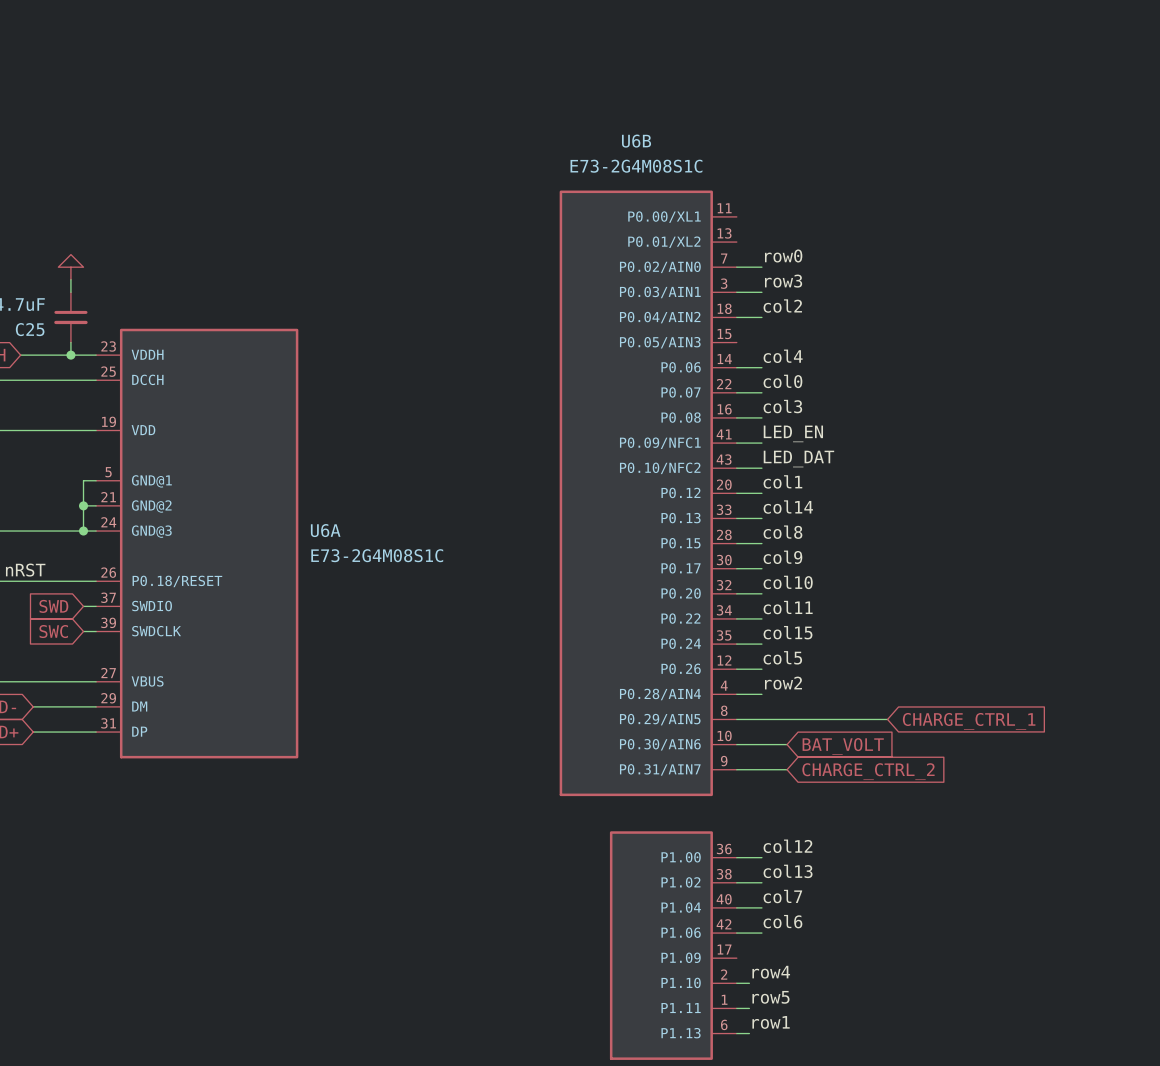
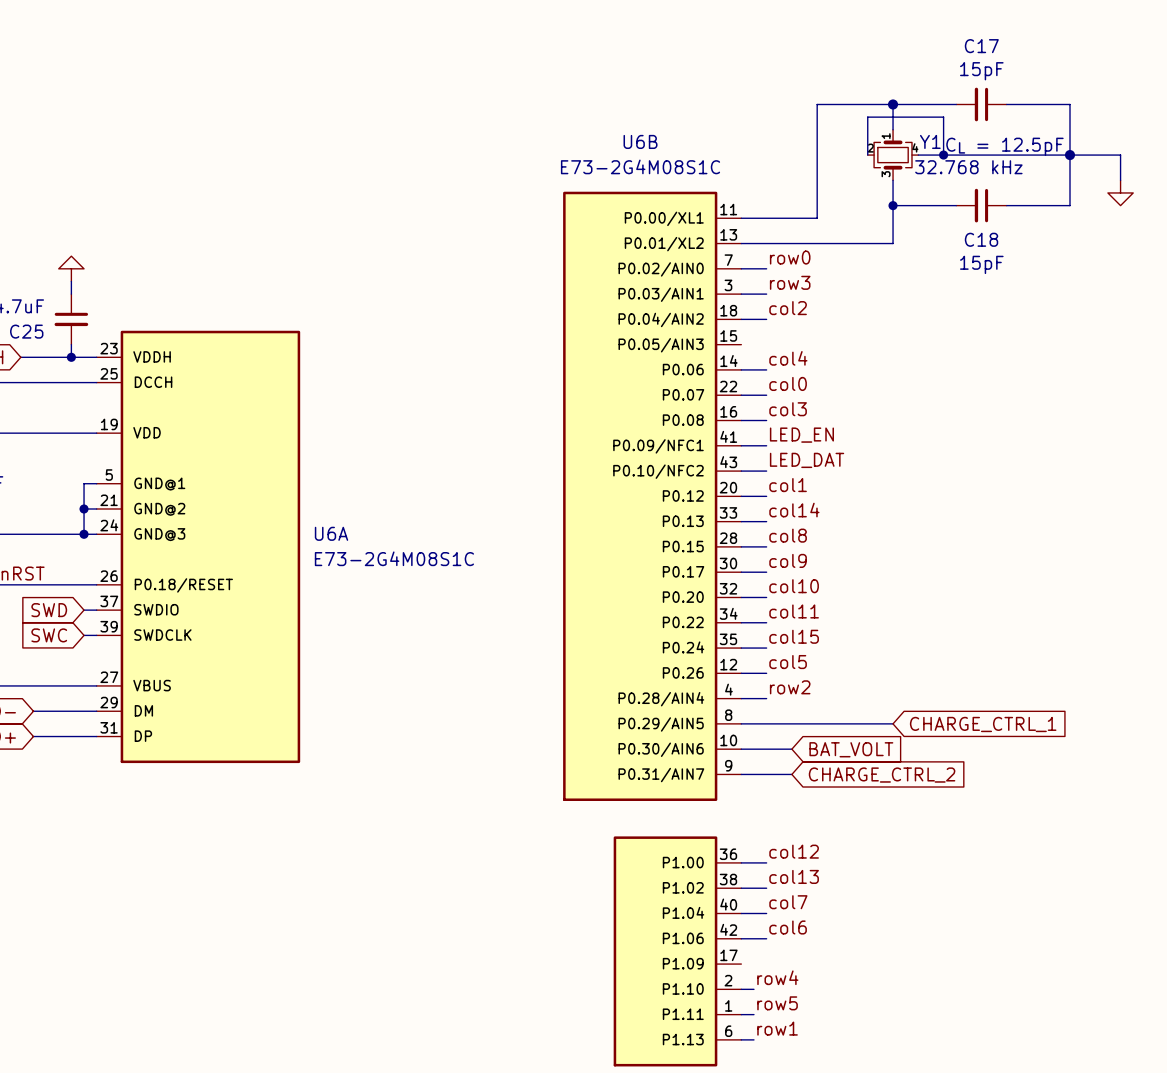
wire: none -> (893, 104) (893, 129)
junction: none -> (893, 104)
wire: none -> (956, 104) (817, 104) (817, 218) (741, 218)
C17: none -> 15pF (981, 104)
wire: none -> (1006, 104) (1070, 104) (1070, 205) (1006, 205)
text: none -> CL = 12.5pF (1004, 146)
wire: none -> (867, 155) (867, 117) (943, 117) (943, 155)
Y1: none -> 32.768 kHz (893, 155)
wire: none -> (918, 155) (1120, 155) (1120, 180)
junction: none -> (943, 155)
junction: none -> (1070, 155)
wire: none -> (893, 180) (893, 243) (741, 243)
power symbol: none -> (1120, 192)
wire: none -> (893, 205) (956, 205)
junction: none -> (893, 205)
C18: none -> 15pF (981, 205)

